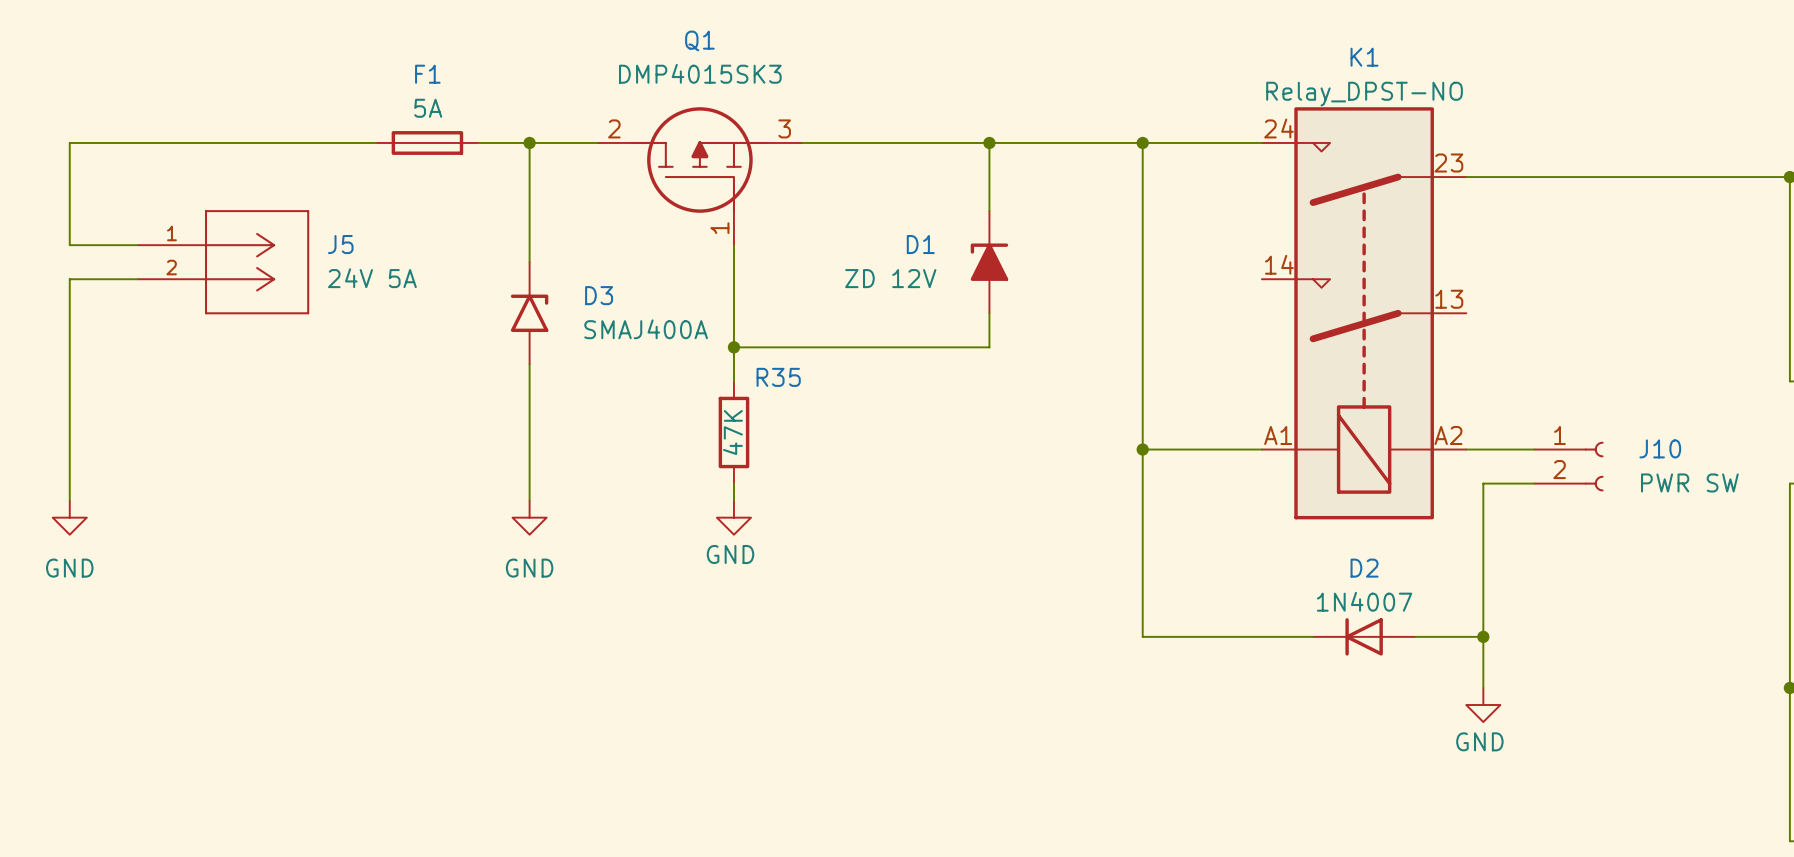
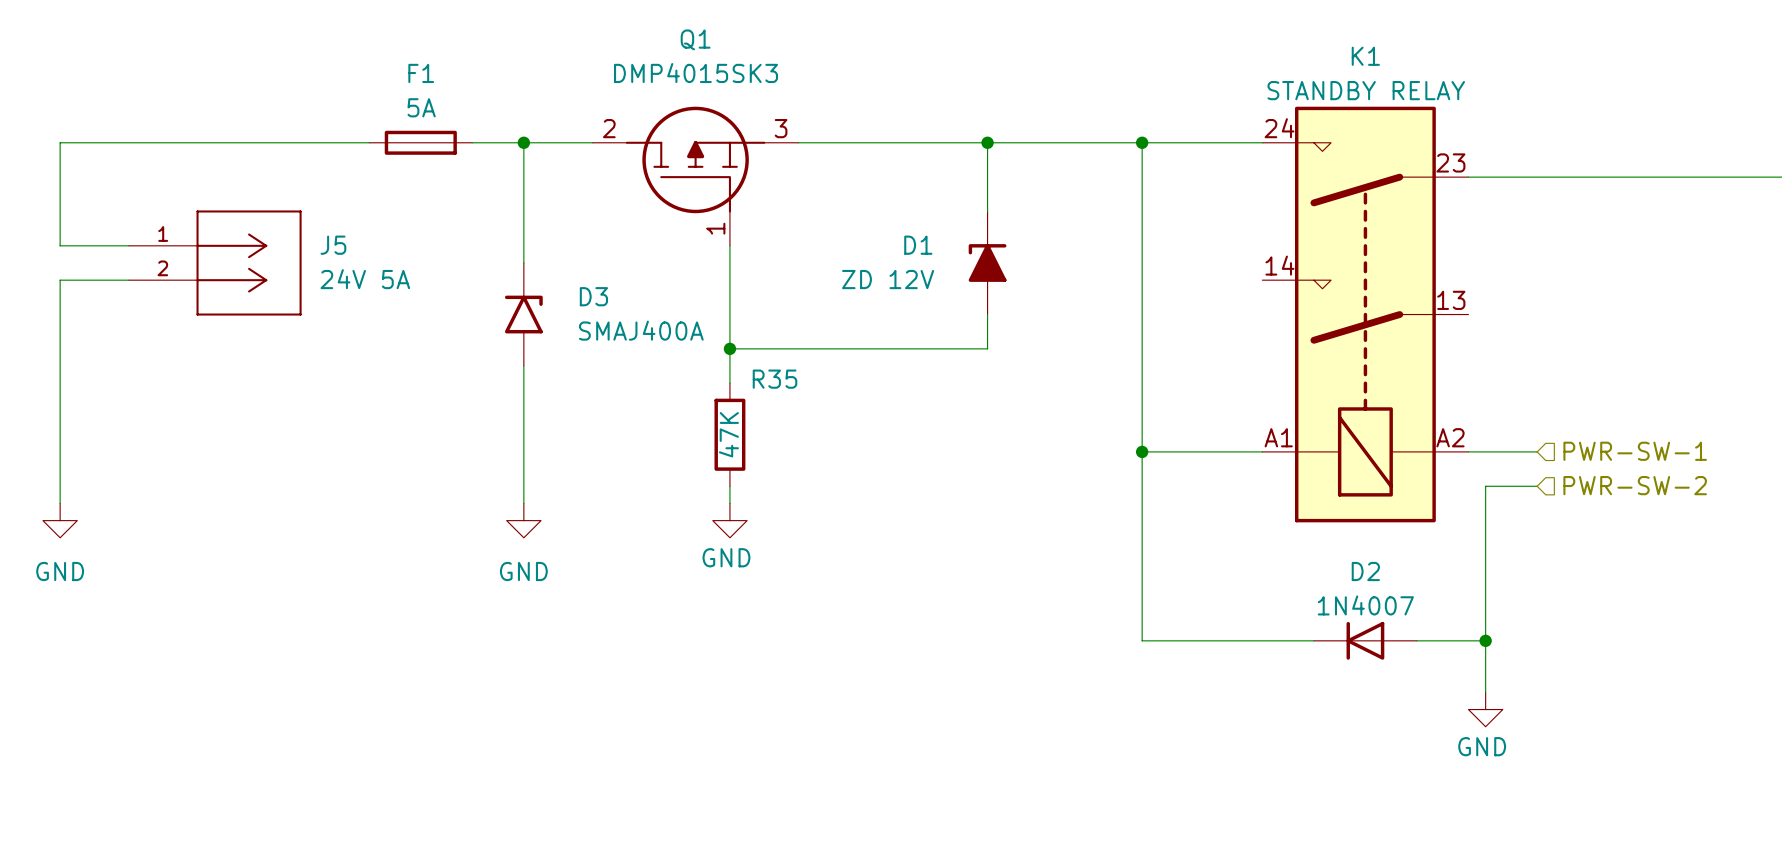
K1 value: Relay_DPST-NO (1364, 94) -> STANDBY RELAY (1366, 90)
hierarchical label: none -> PWR-SW-1 (1635, 451)
J10: PWR SW (1569, 466) -> none
hierarchical label: none -> PWR-SW-2 (1635, 485)

